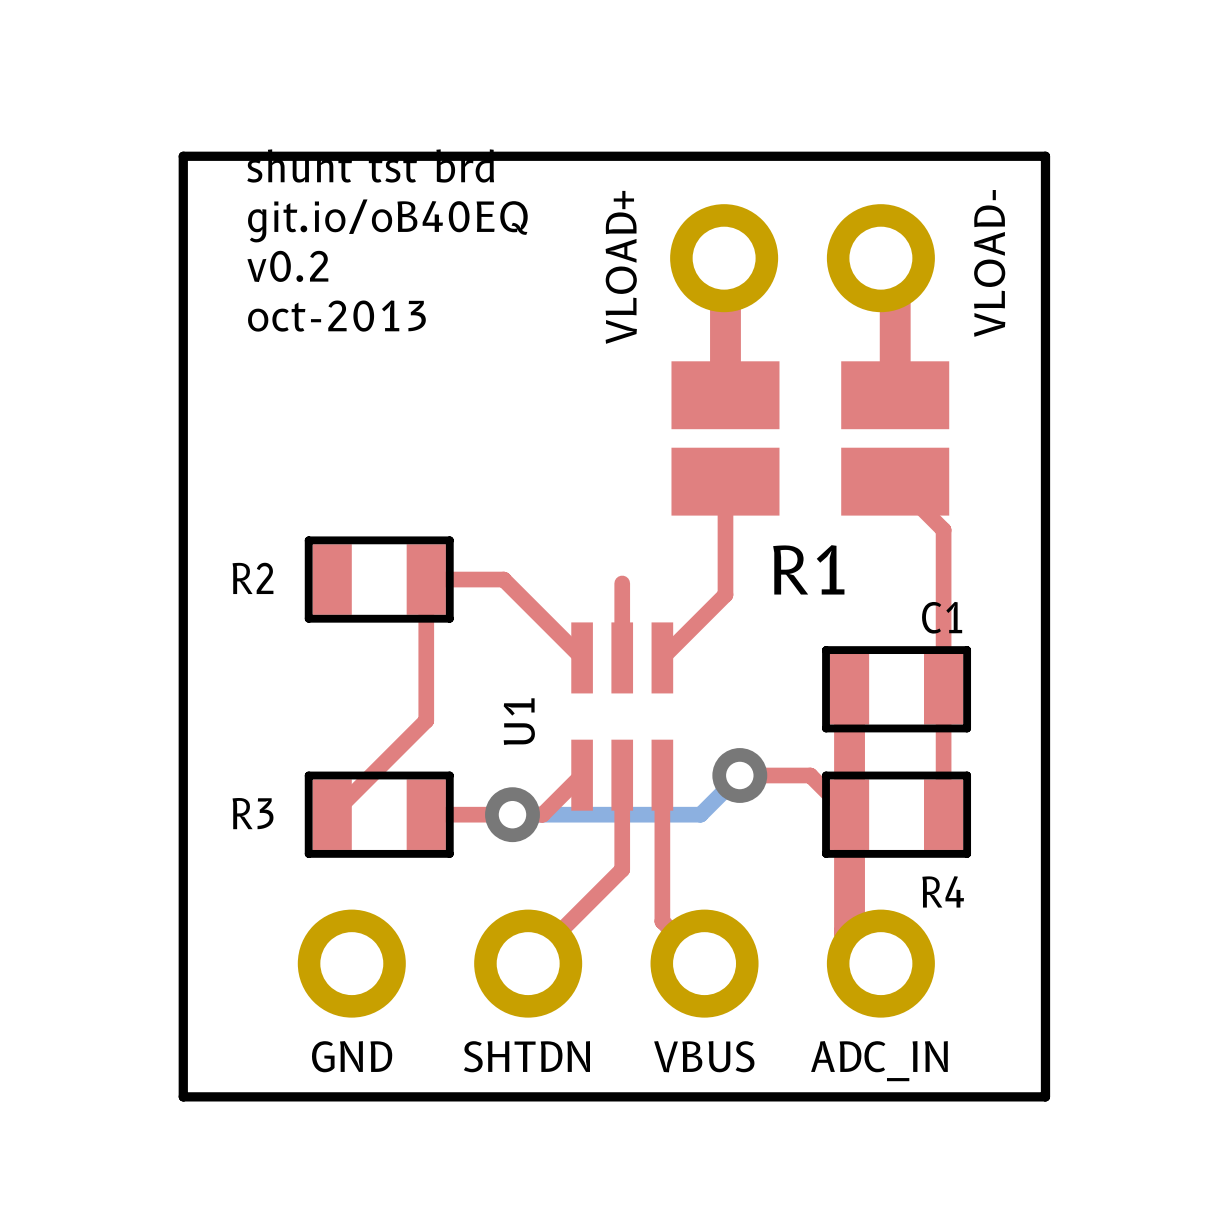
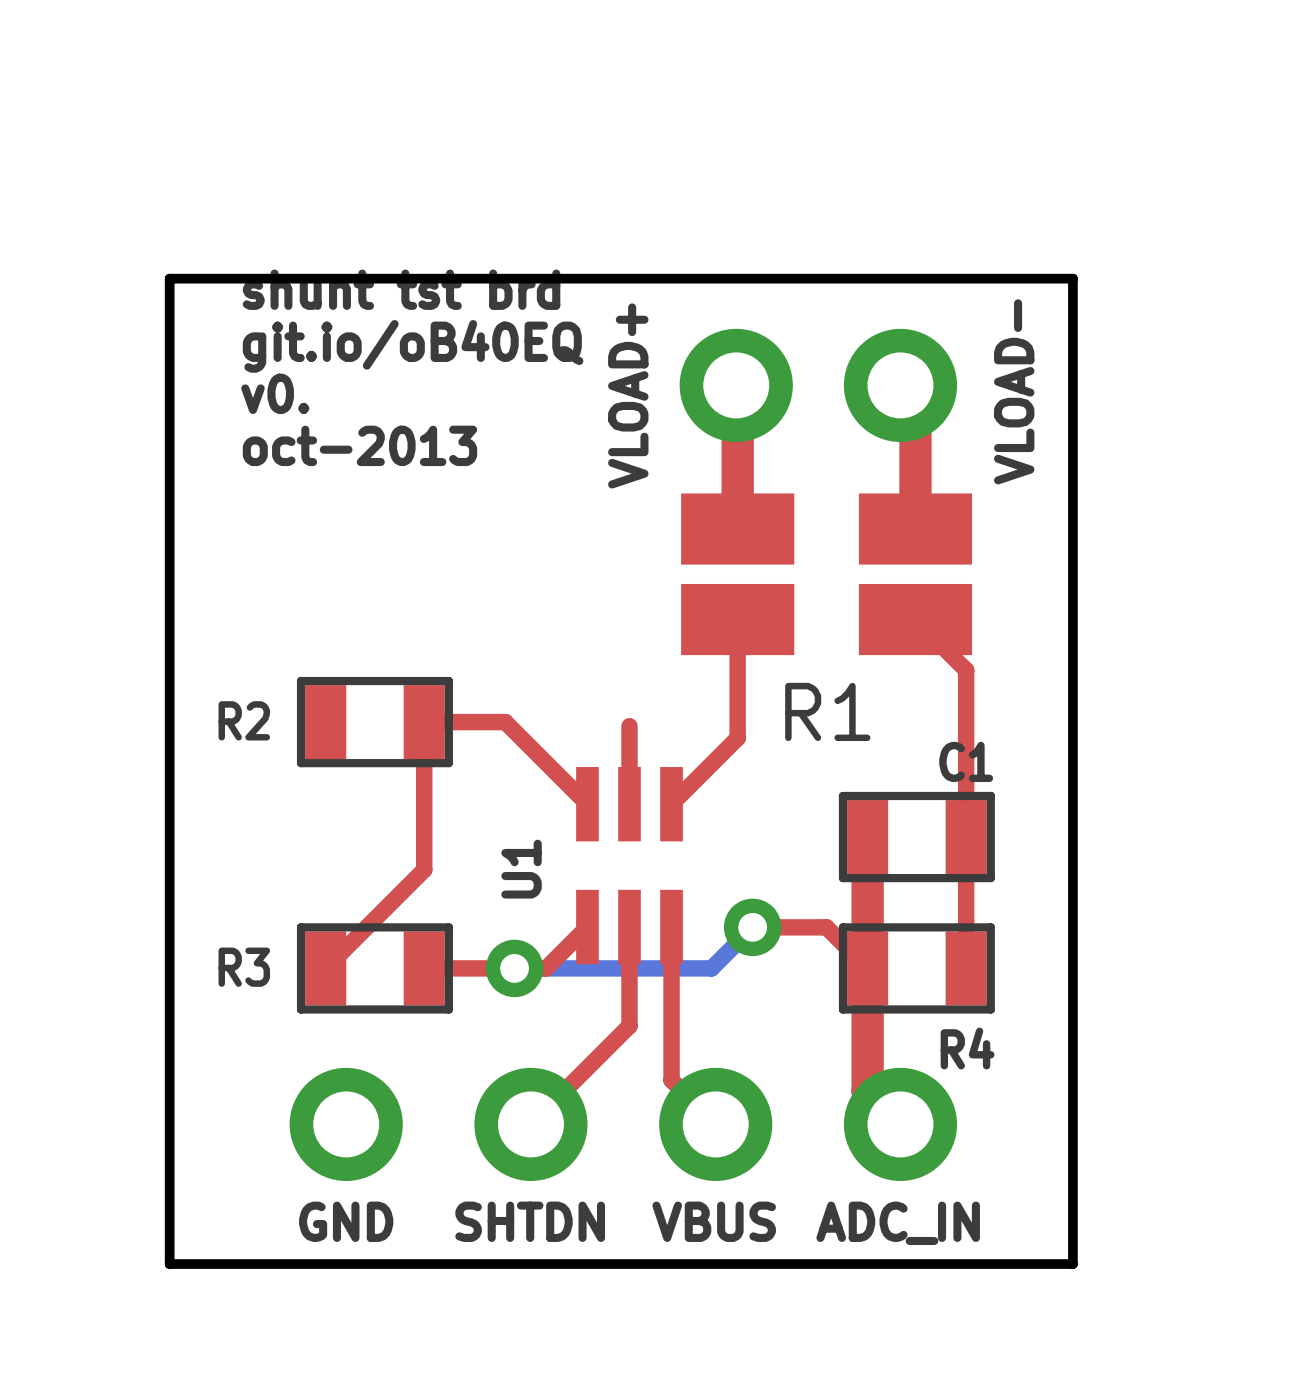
text: v0.2 (287, 266) -> v0. (275, 393)

